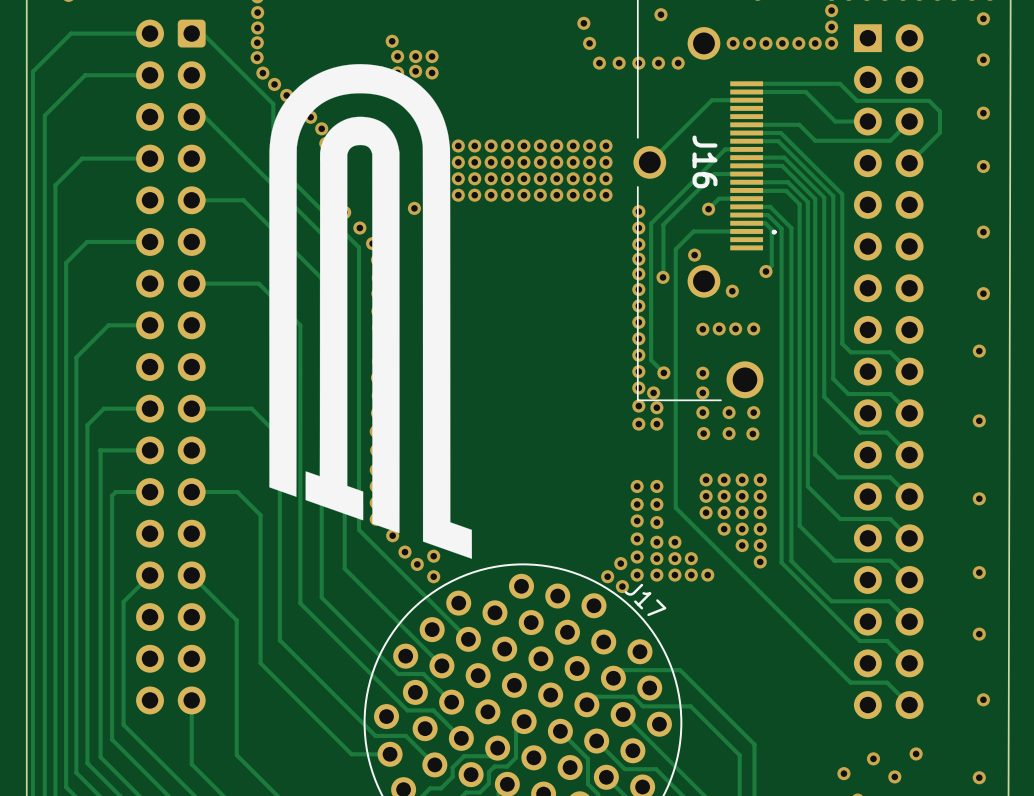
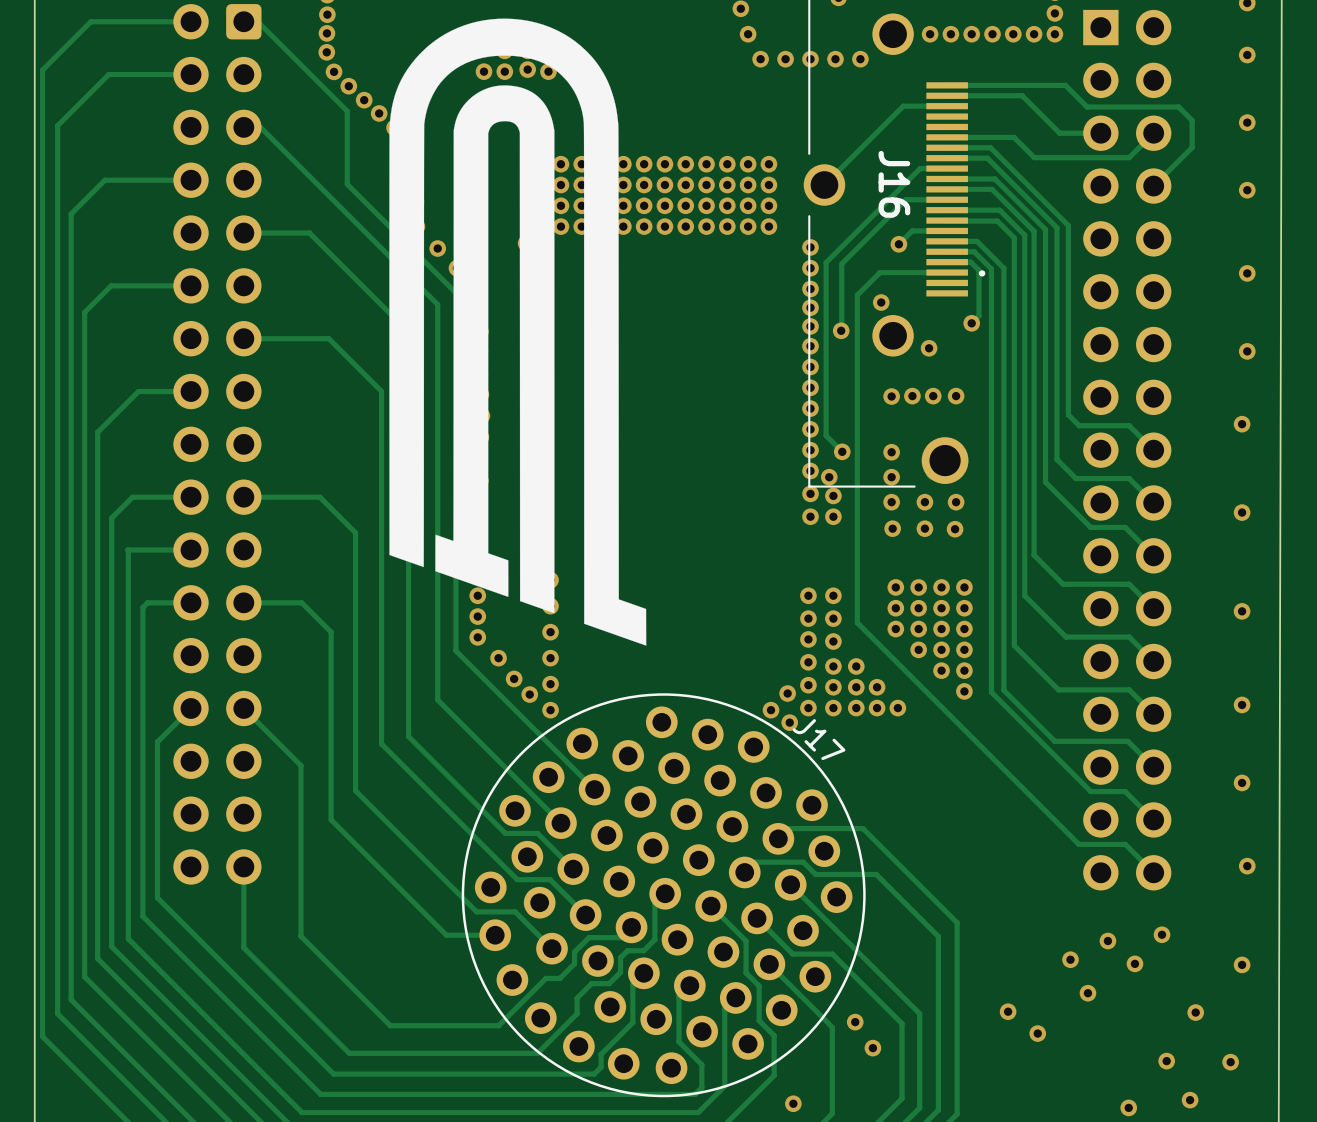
via: none -> (560, 226)
drawing position: (370, 311) -> (517, 332)

